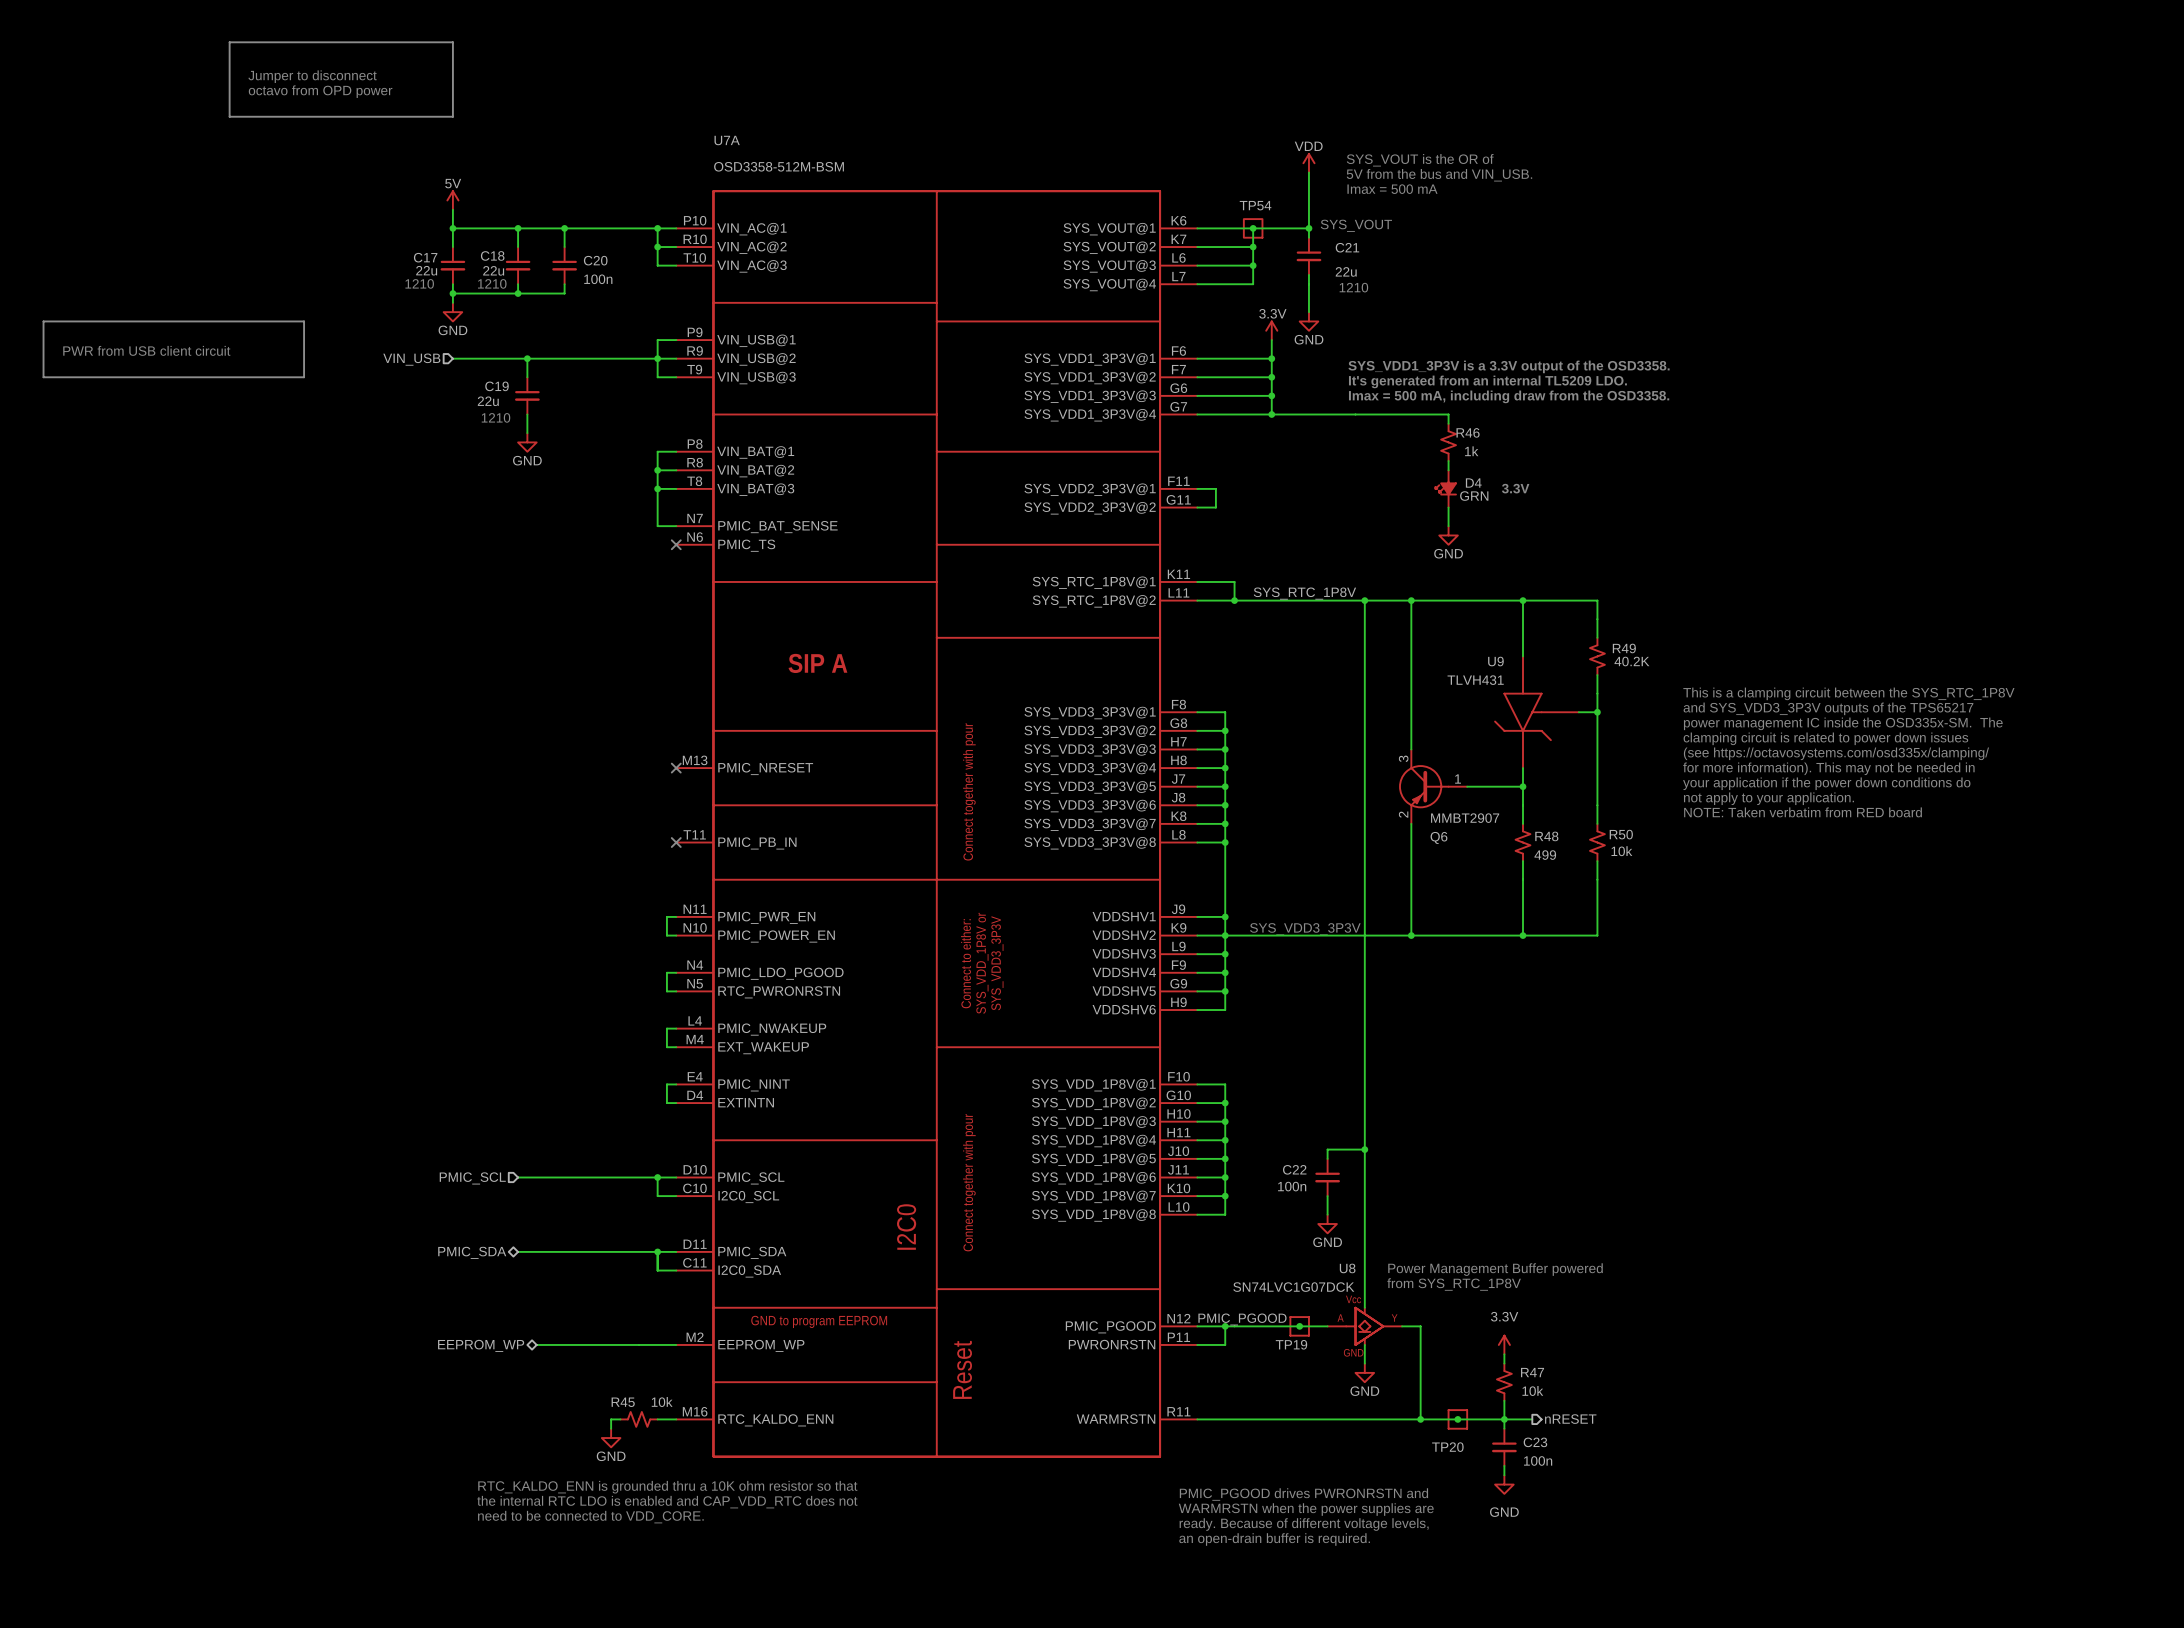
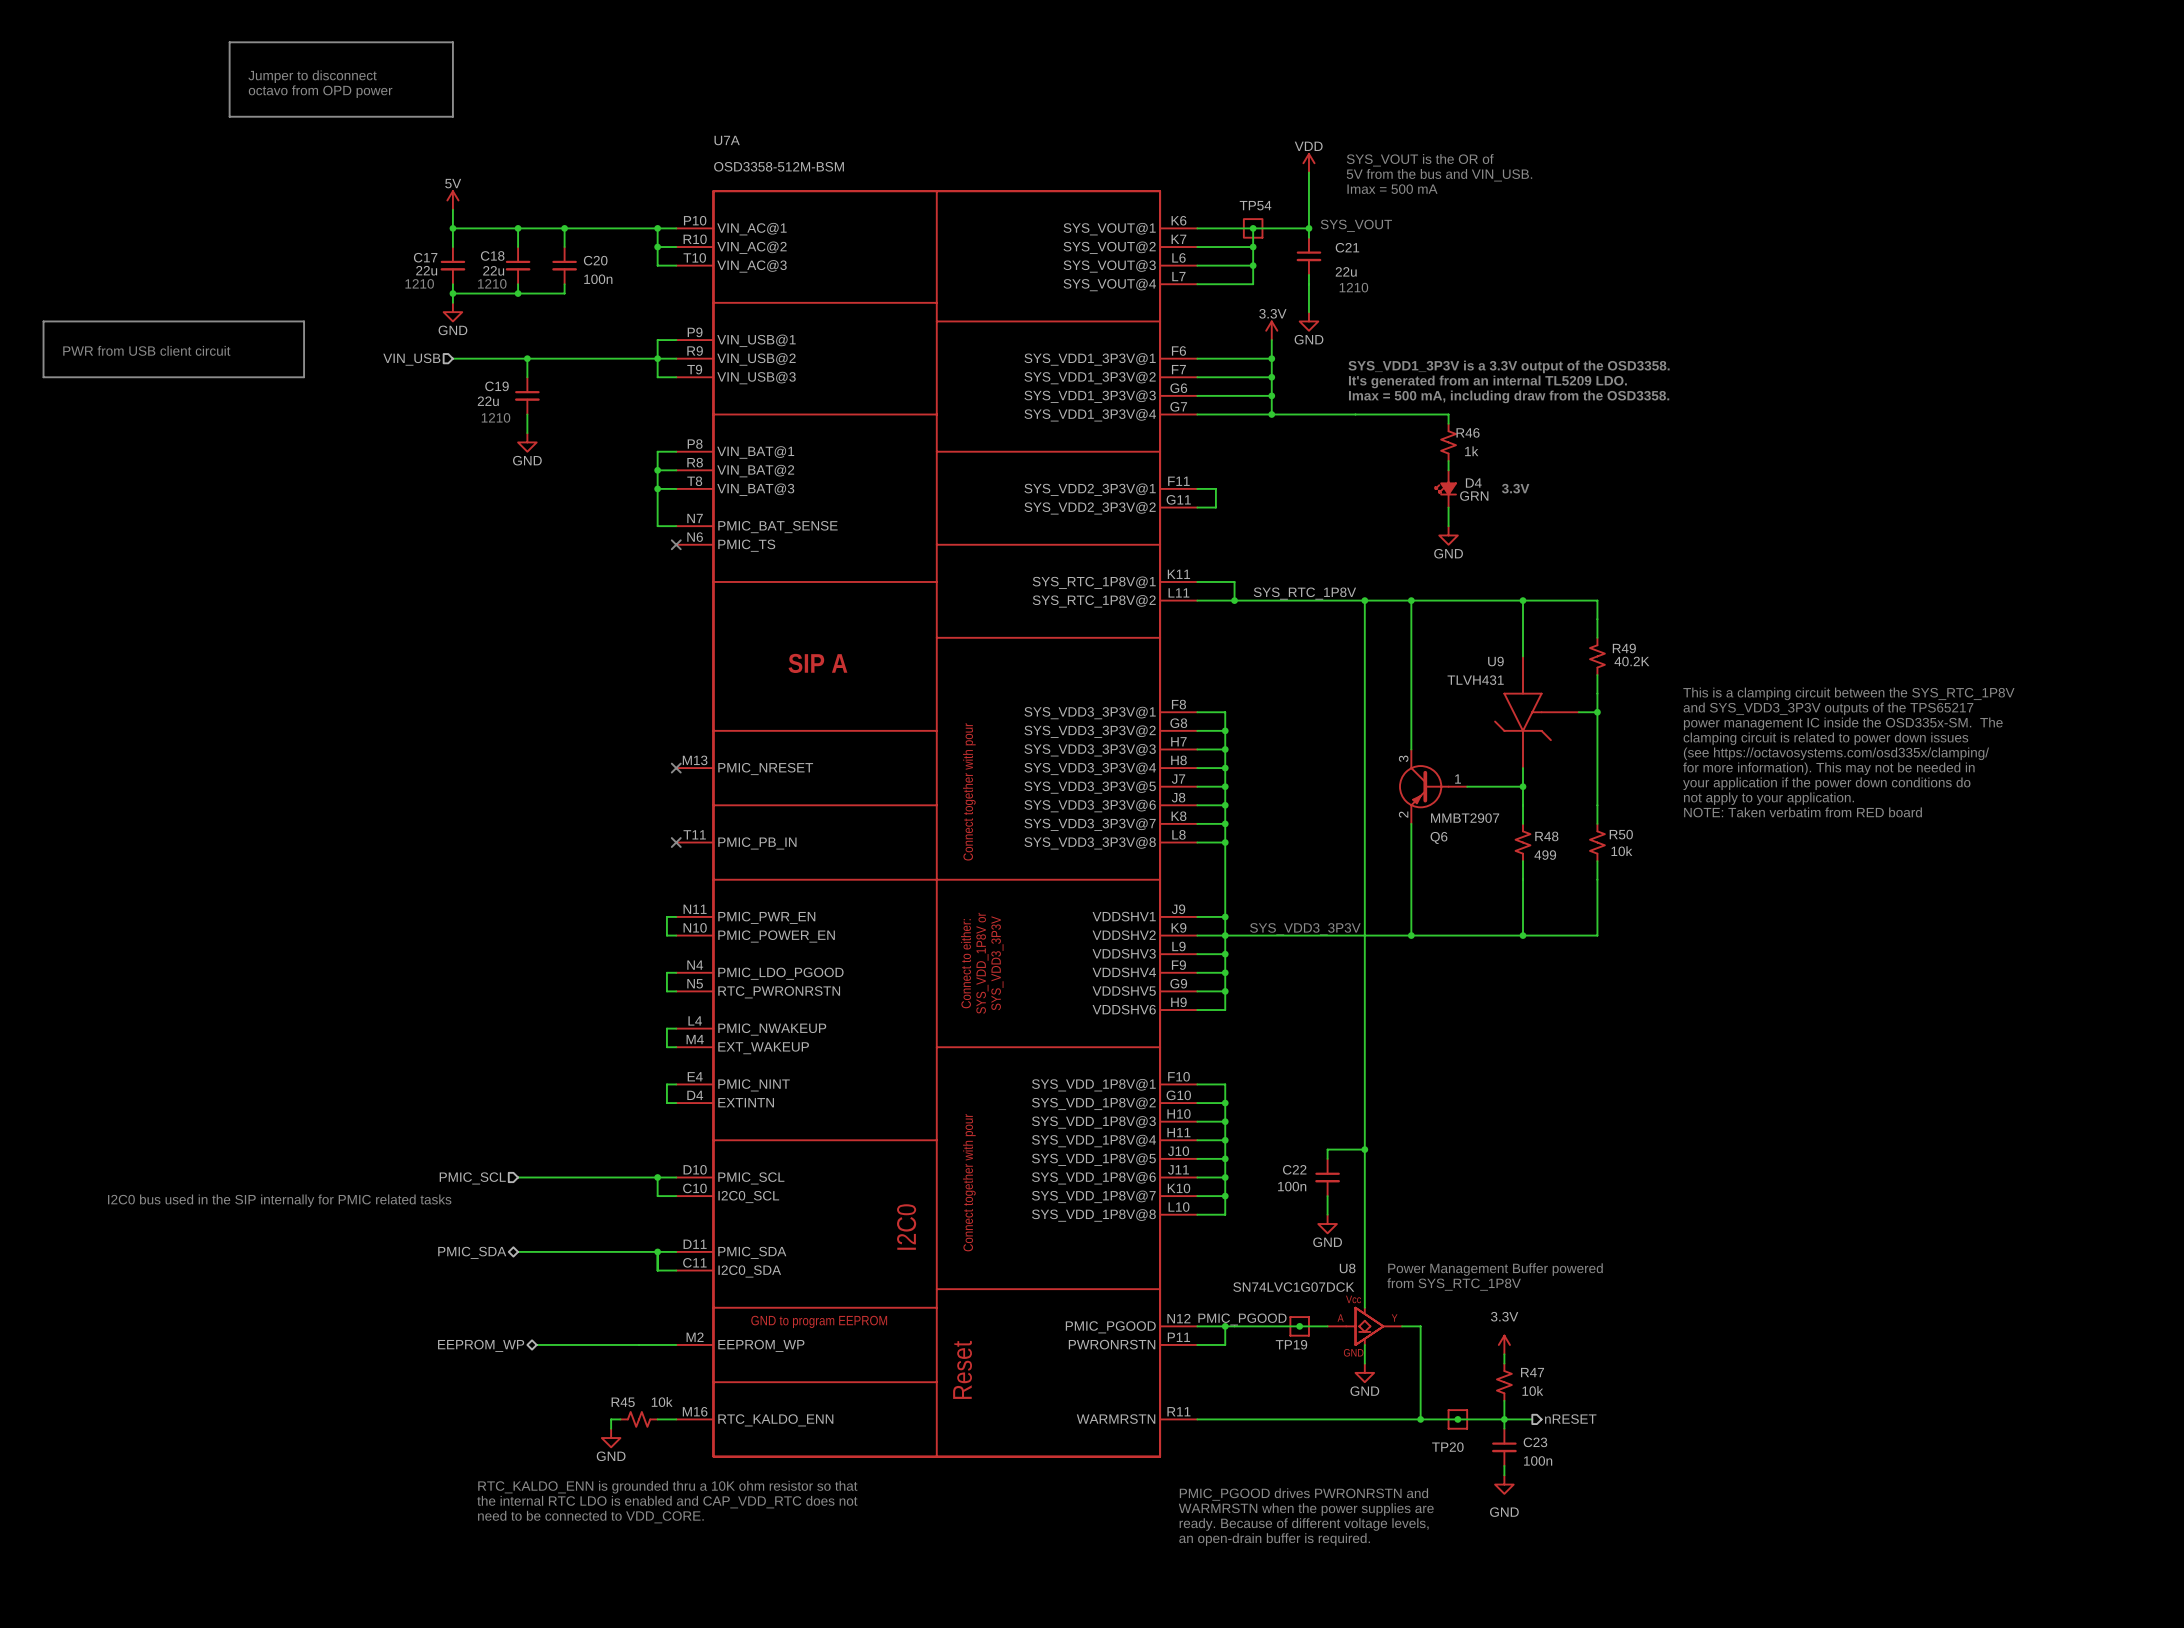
text: none -> I2C0 bus used in the SIP internally for PMIC related tasks (279, 1200)

